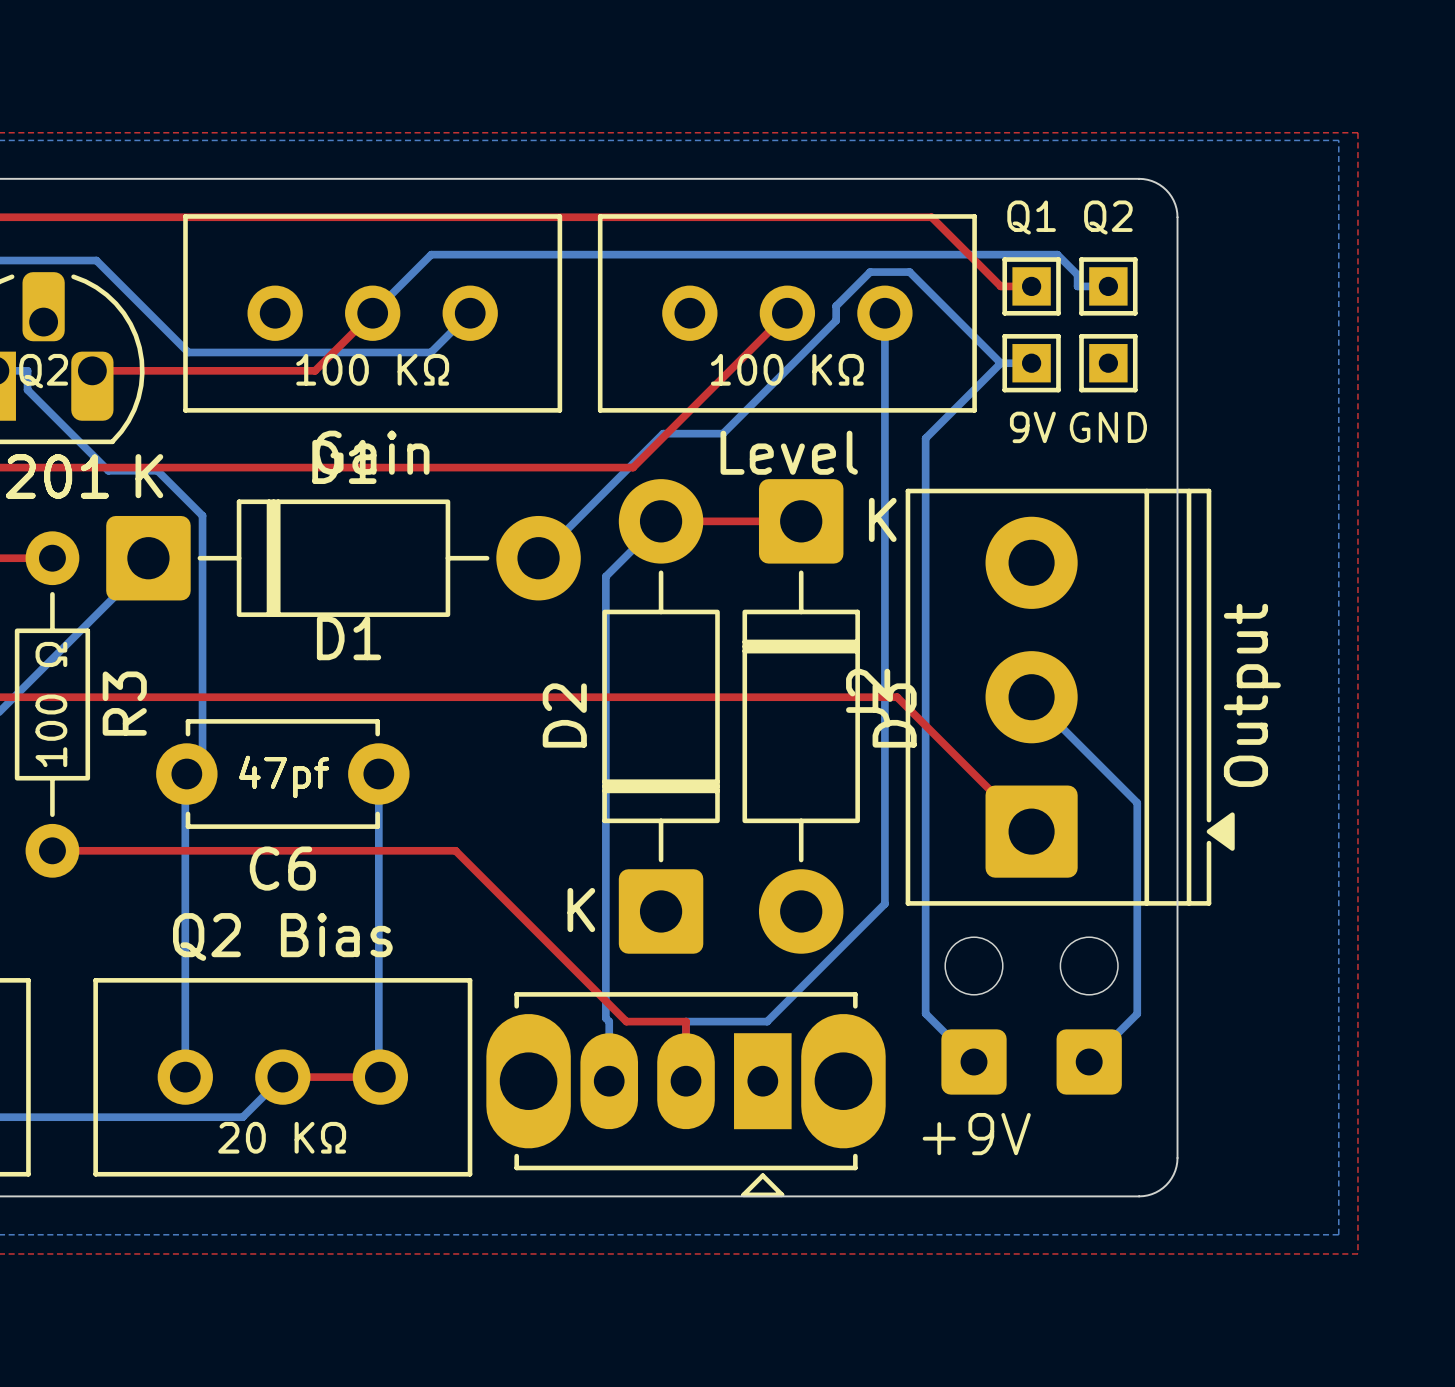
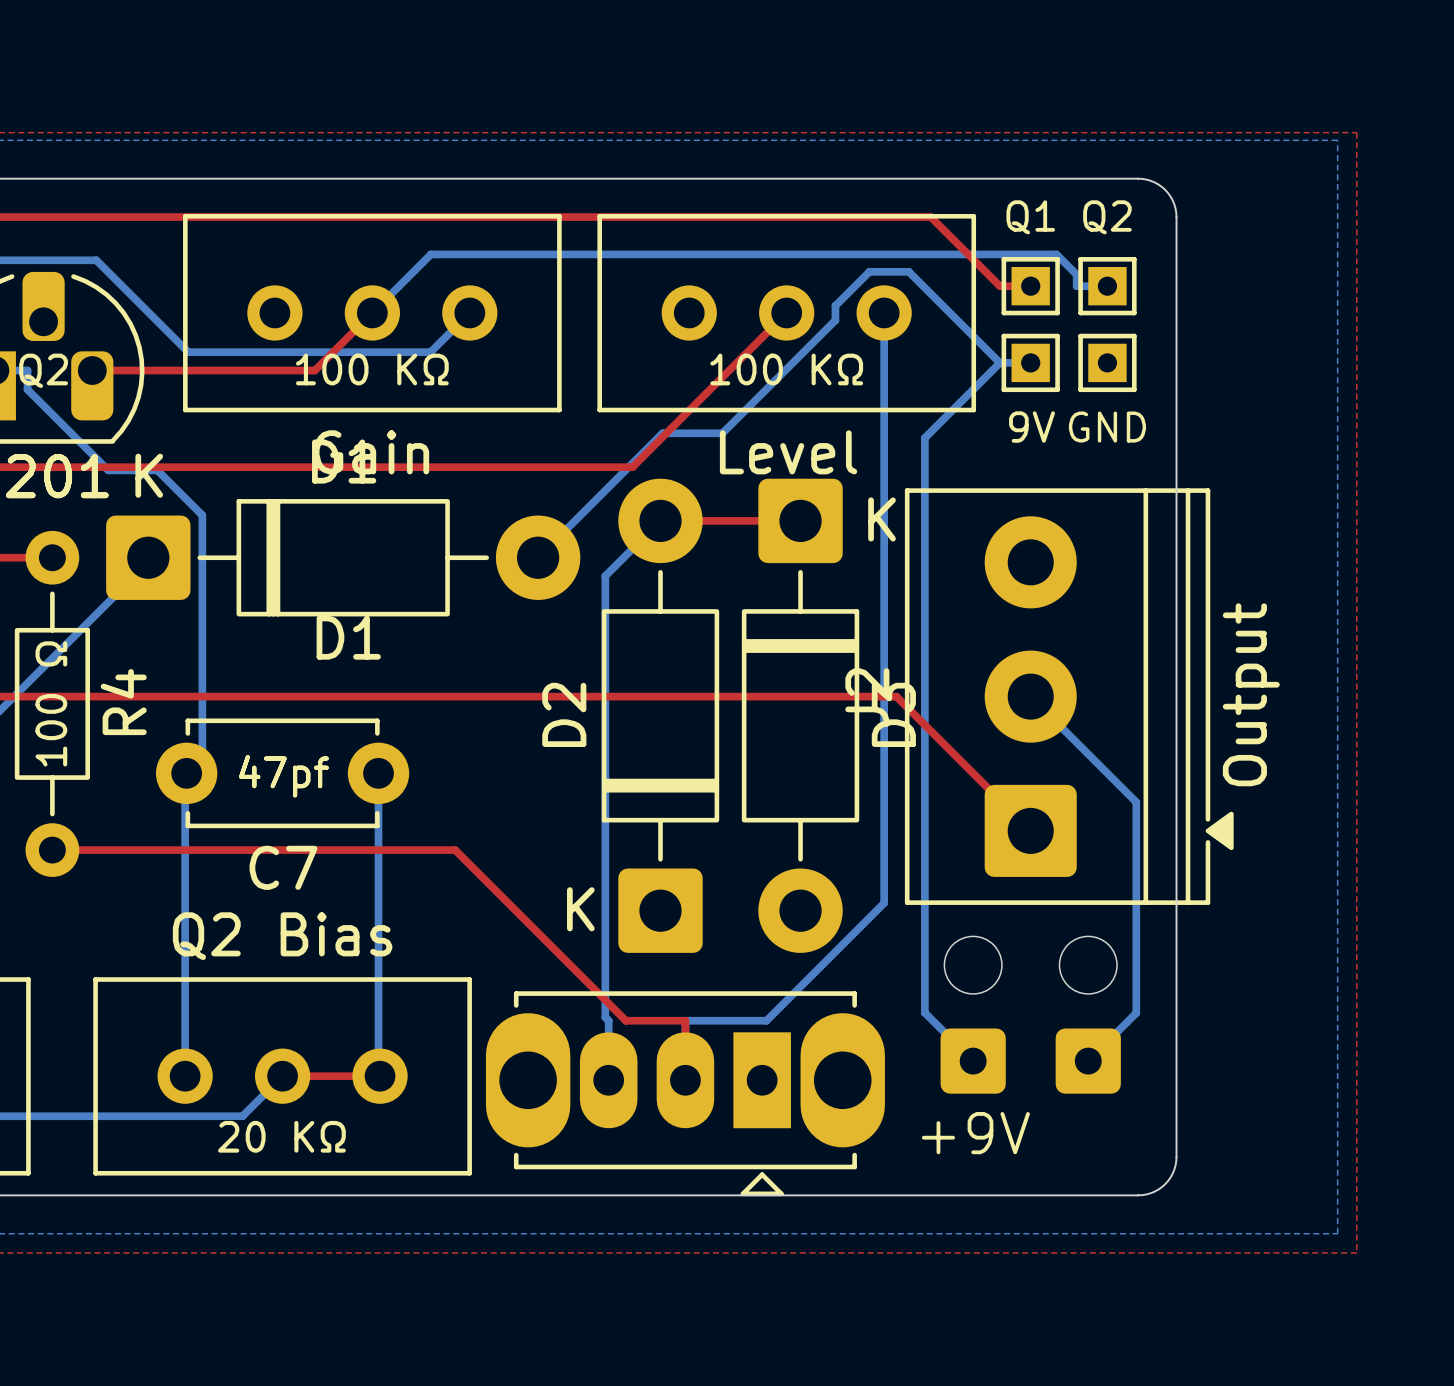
text: R3 (124, 703) -> R4 (123, 702)
text: C6 (282, 868) -> C7 (283, 867)

